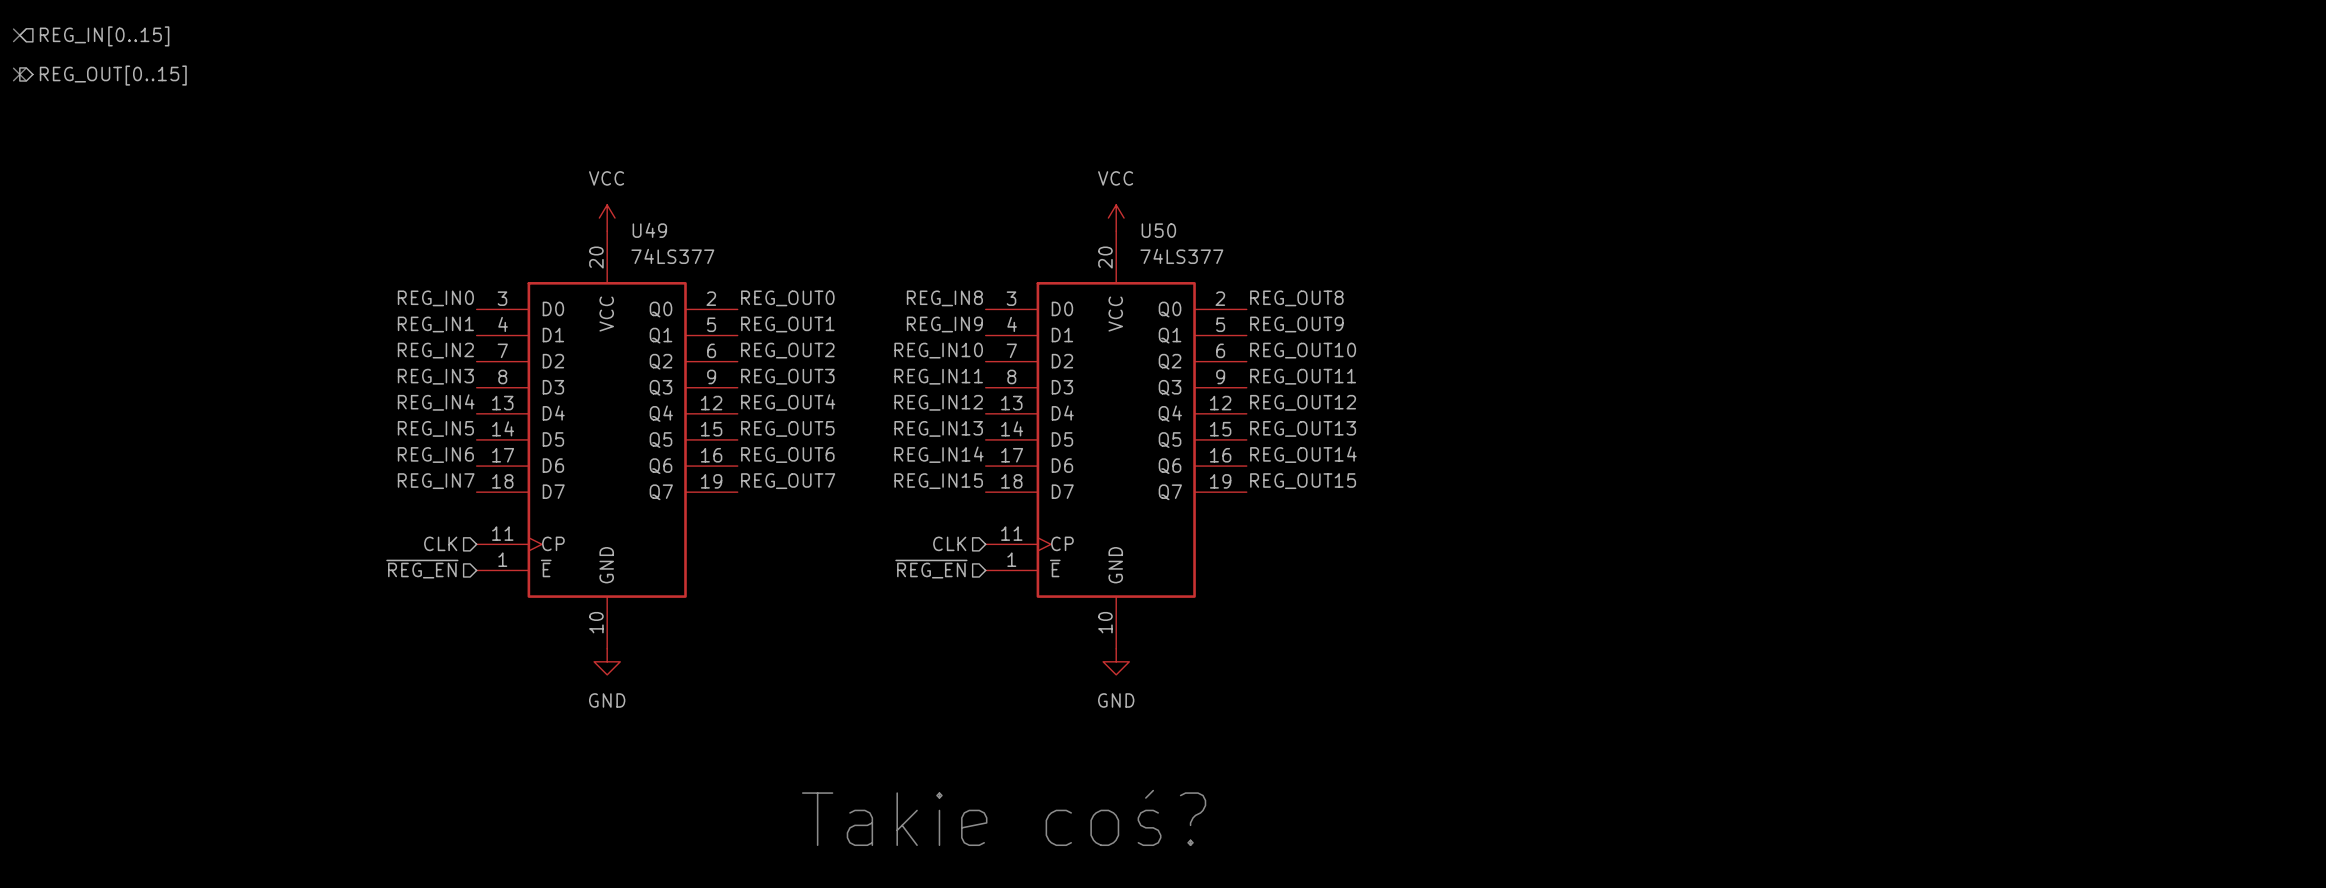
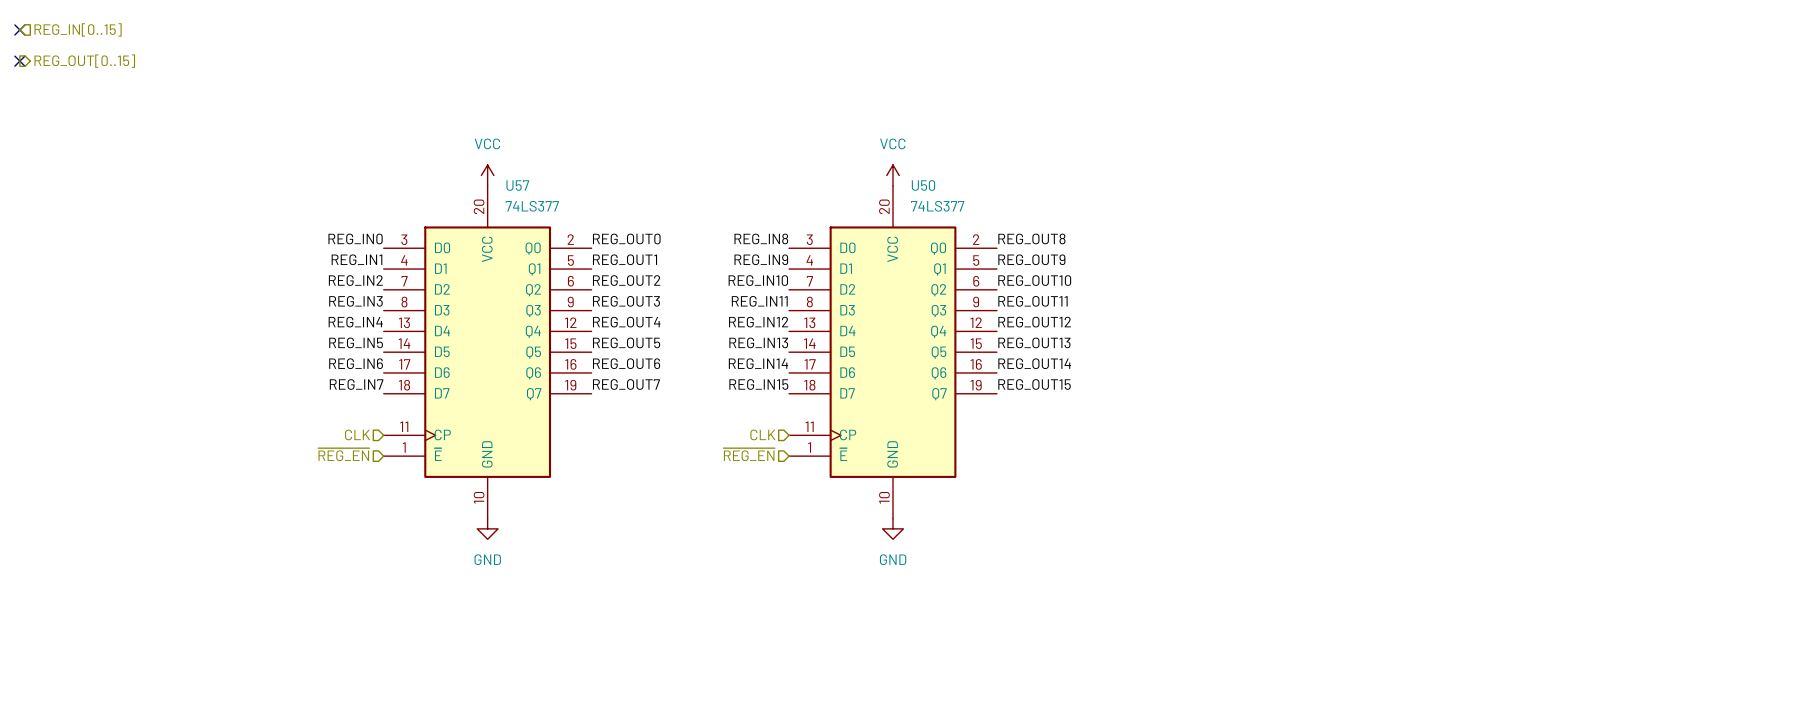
U49 name: U49 (649, 230) -> U57 (517, 185)
text: Takie coś? (1004, 817) -> none

